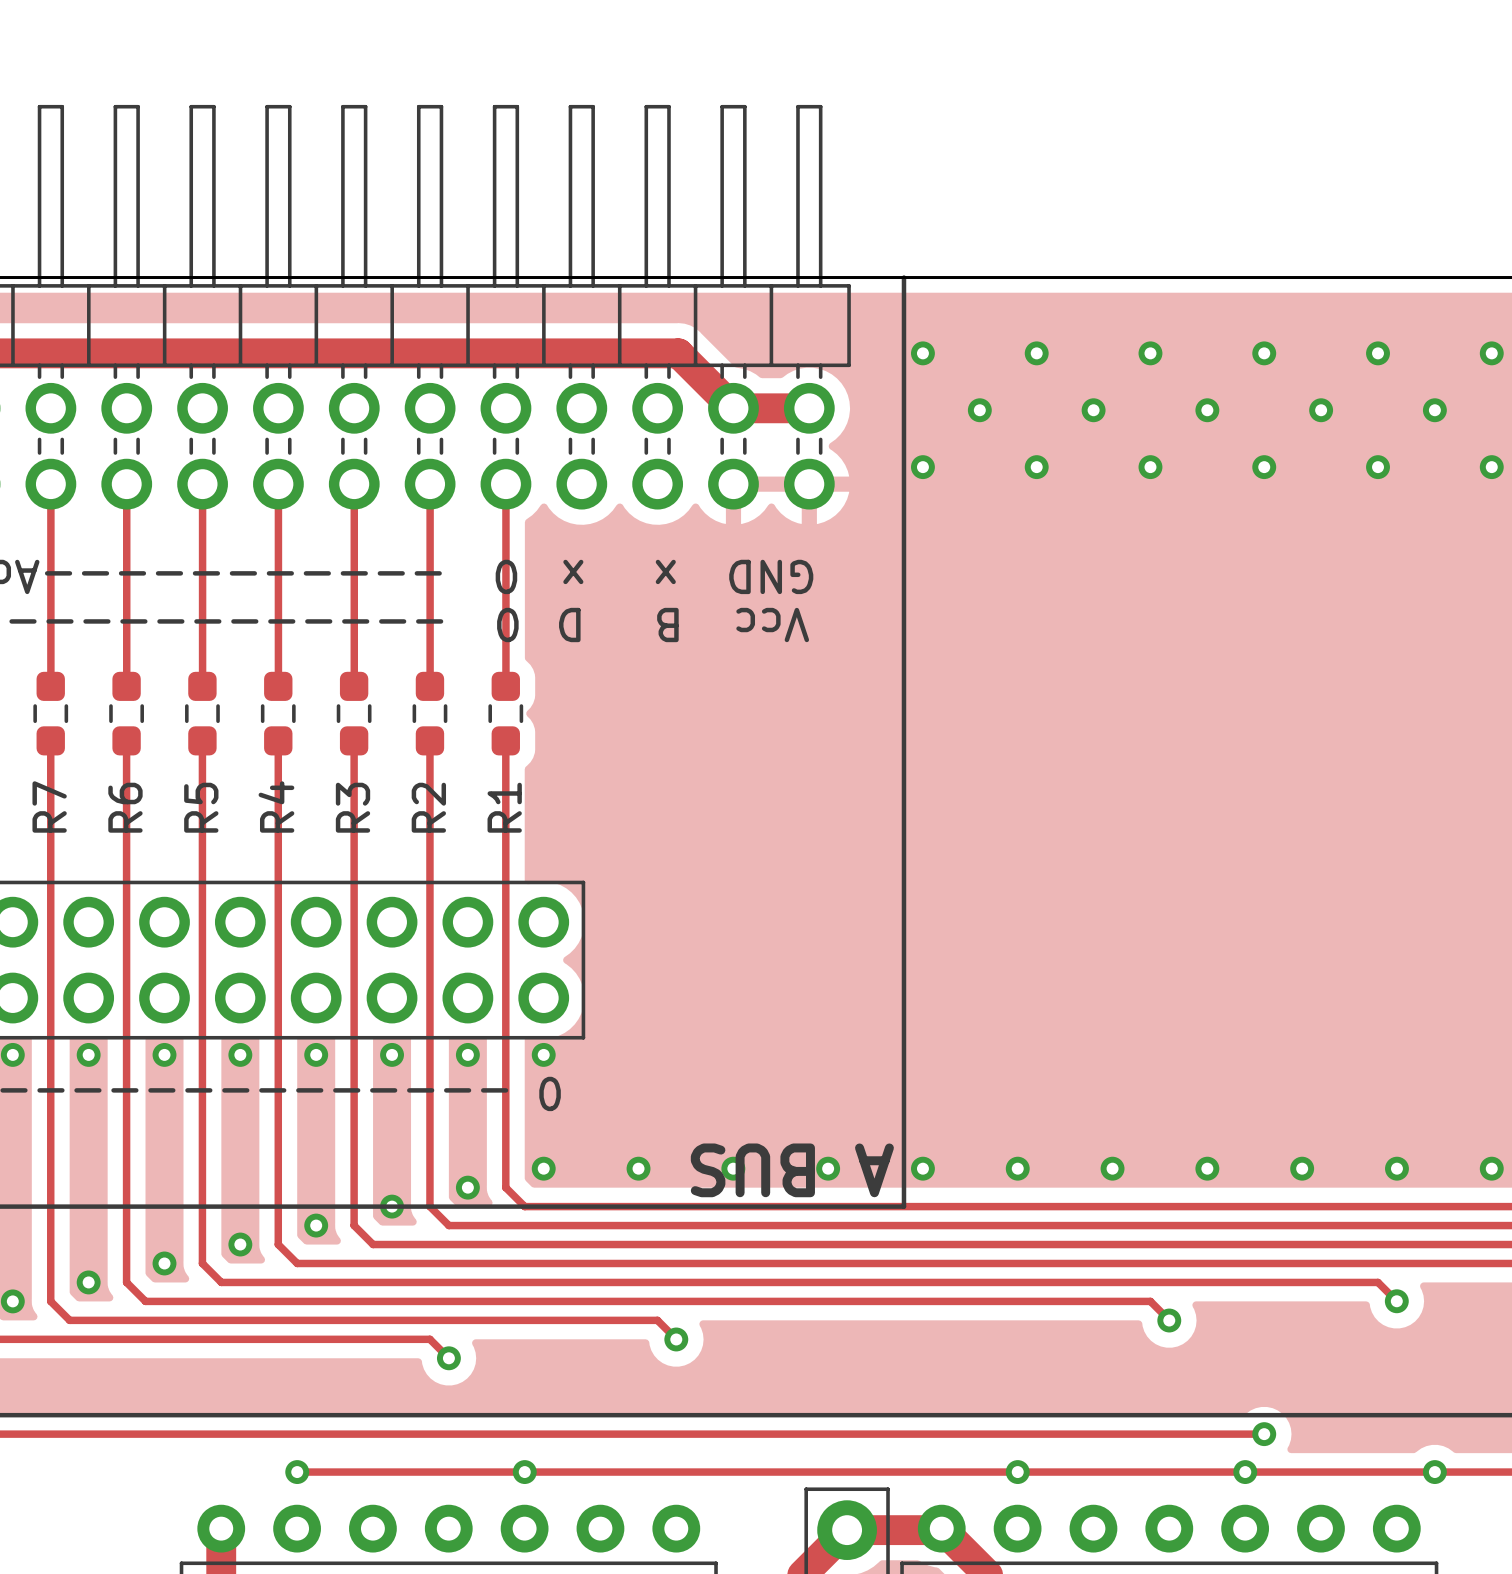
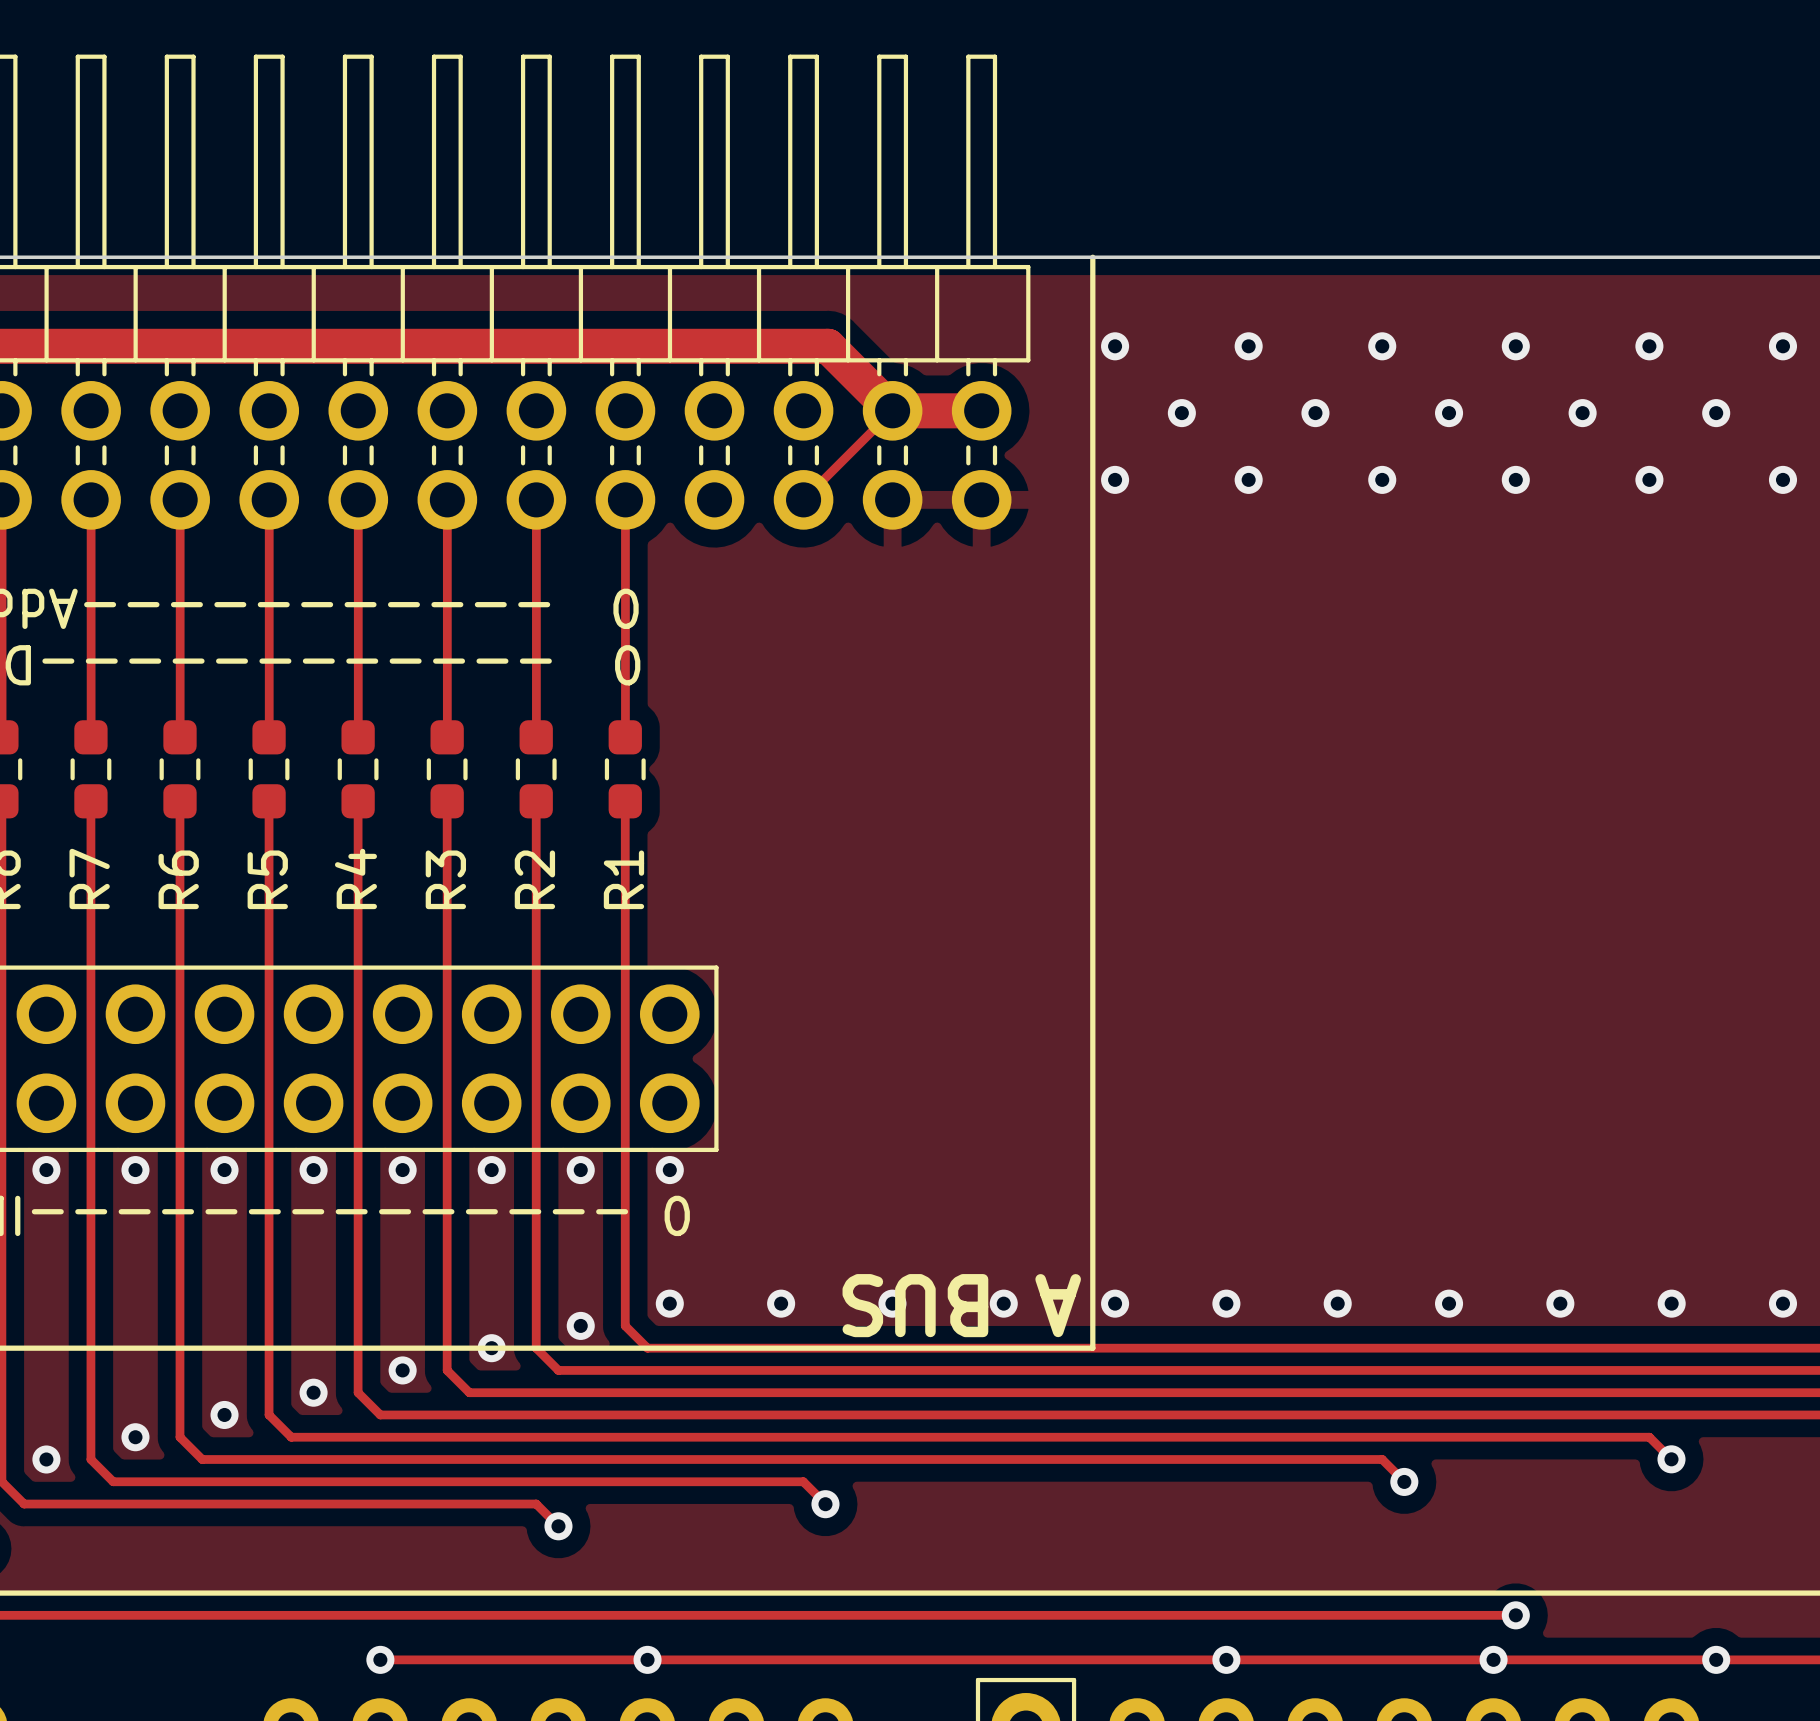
track: none -> (892, 410) (803, 499)
text: x x (619, 571) -> none
text: GND (771, 576) -> none
text: B D (618, 625) -> none
text: Vcc (772, 625) -> none

